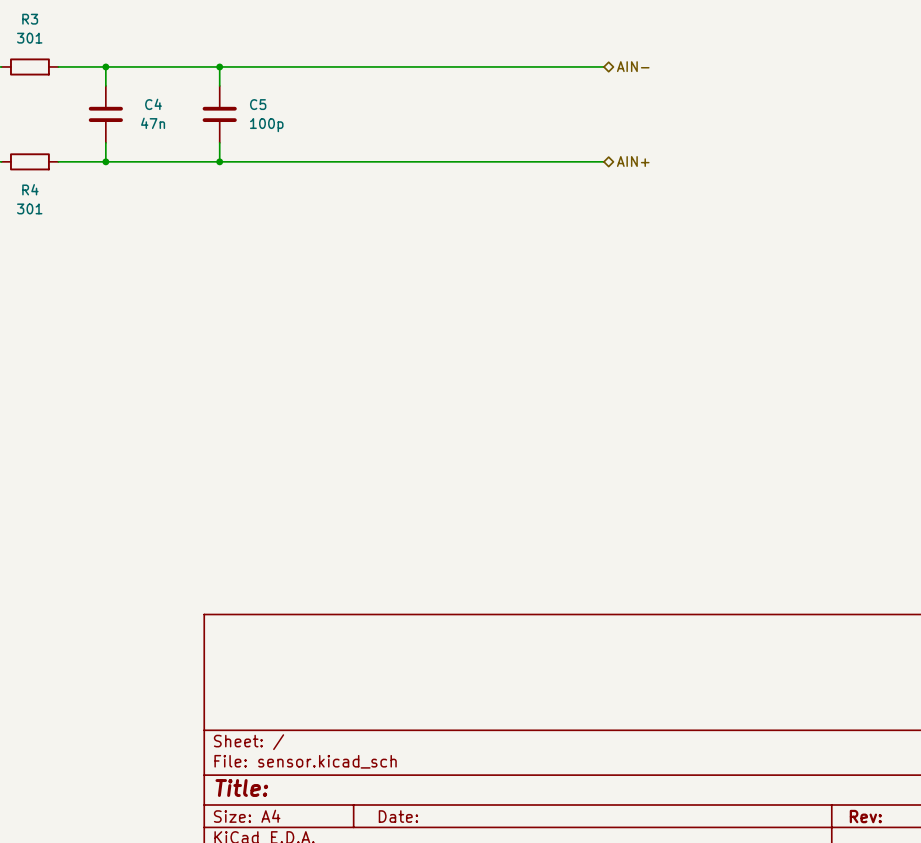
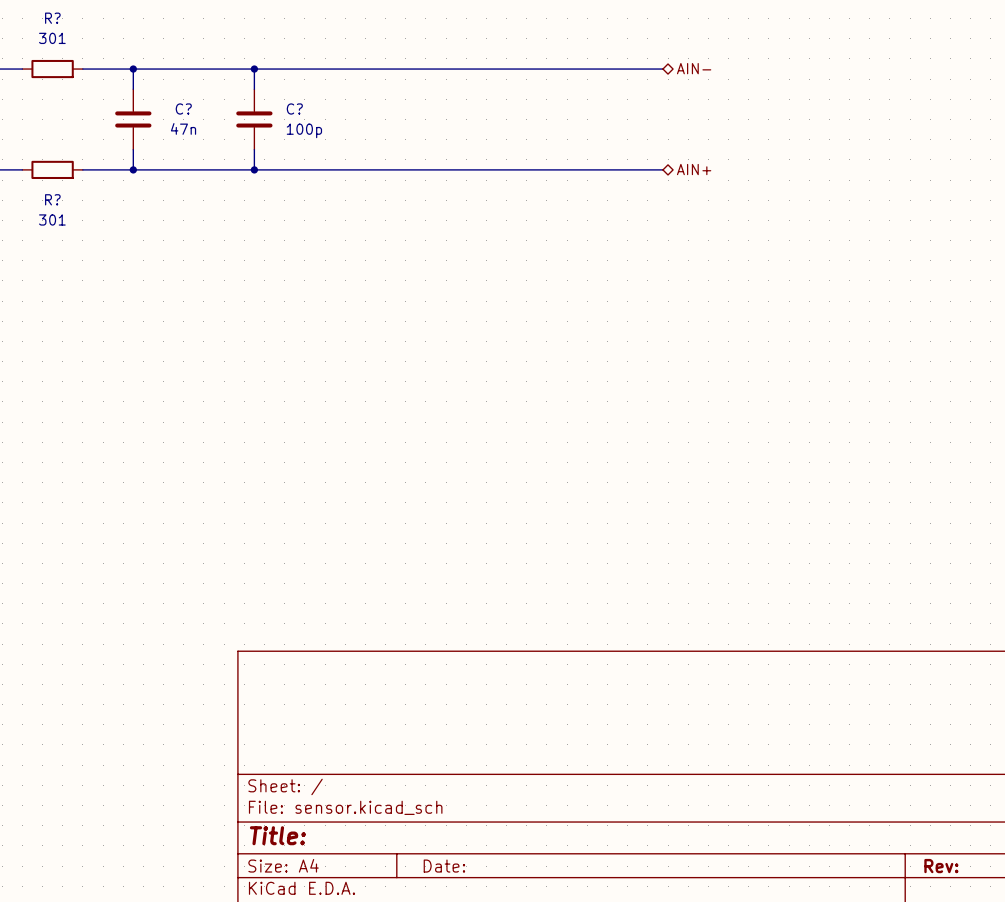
R3 name: R3 (30, 19) -> R? (52, 18)
C4 name: C4 (153, 104) -> C? (183, 109)
C5 name: C5 (258, 104) -> C? (294, 109)
R4 name: R4 (30, 189) -> R? (52, 199)

